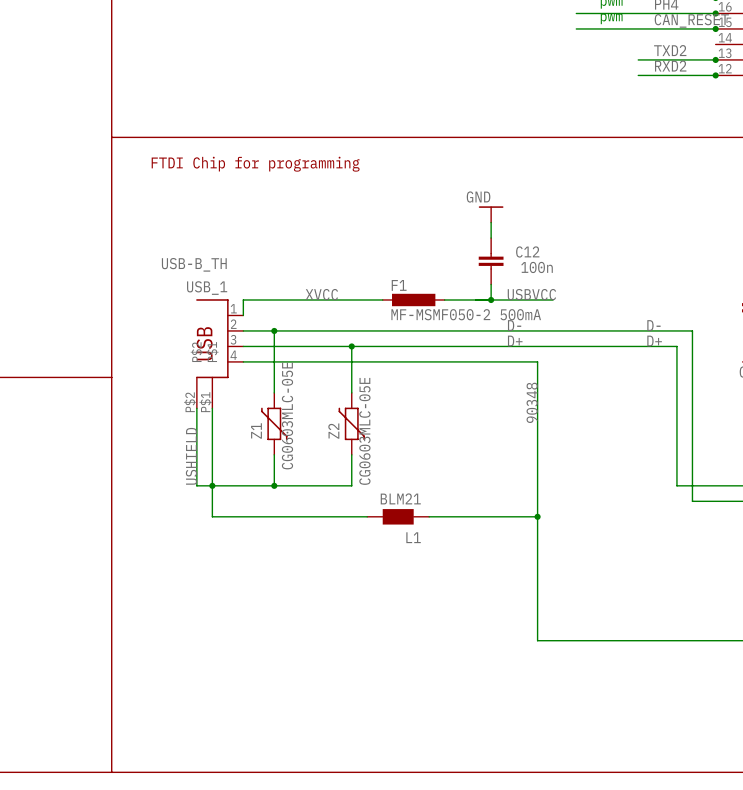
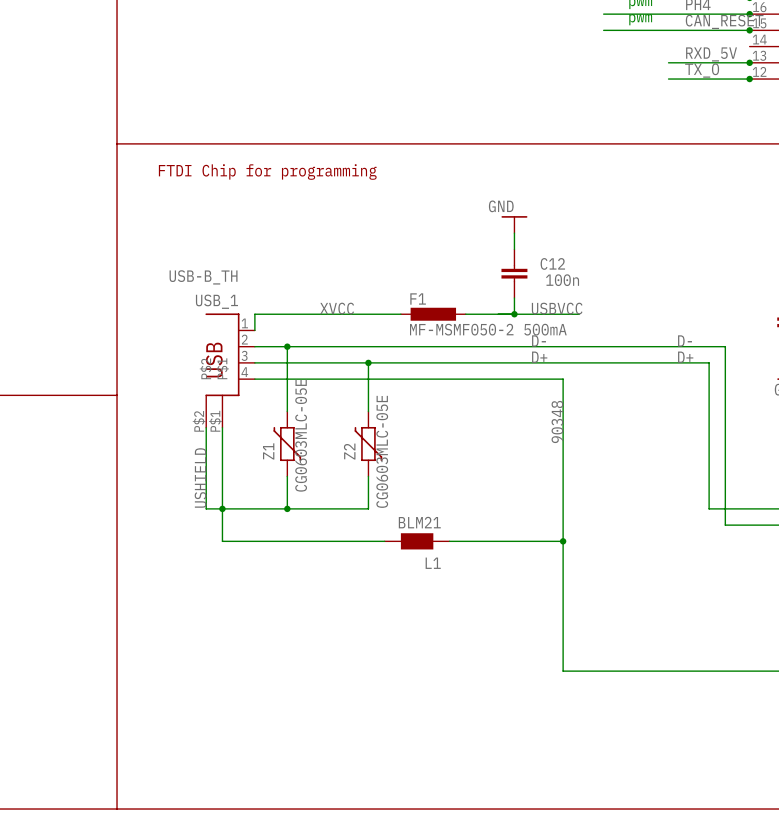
label: TXD2 (670, 50) -> RXD_5V (711, 54)
label: RXD2 (670, 66) -> TX_O (702, 70)

